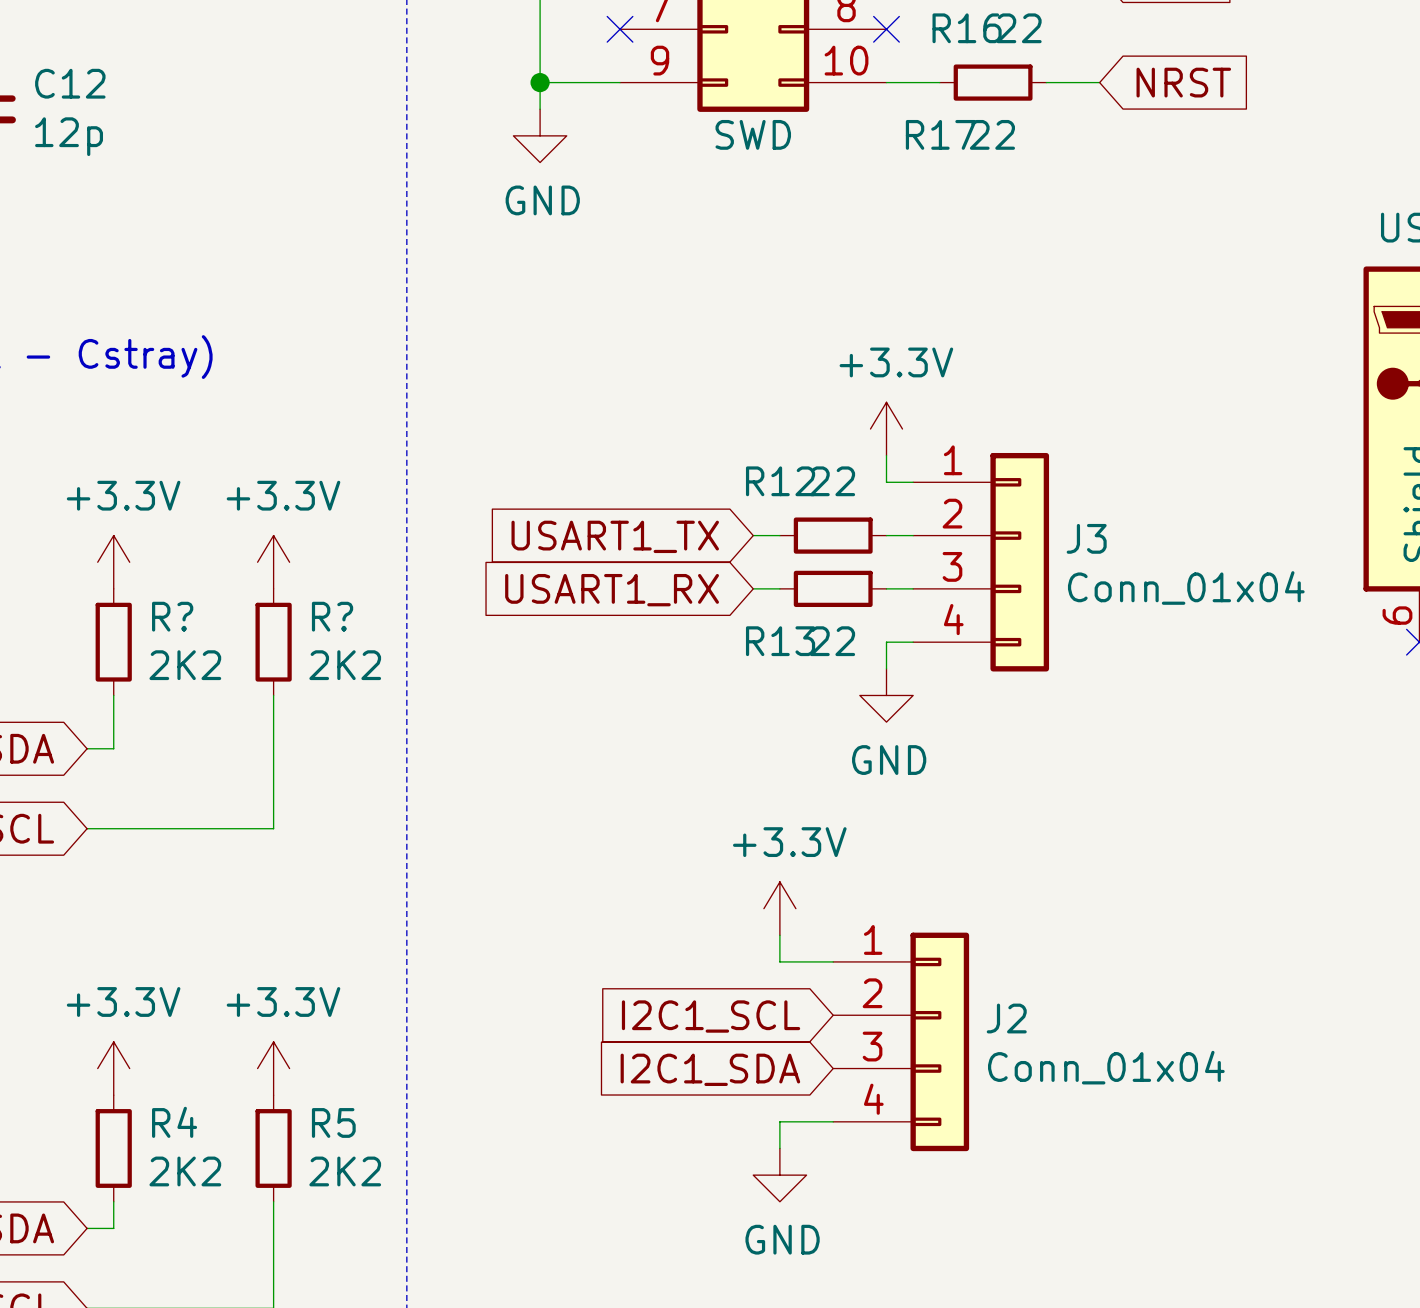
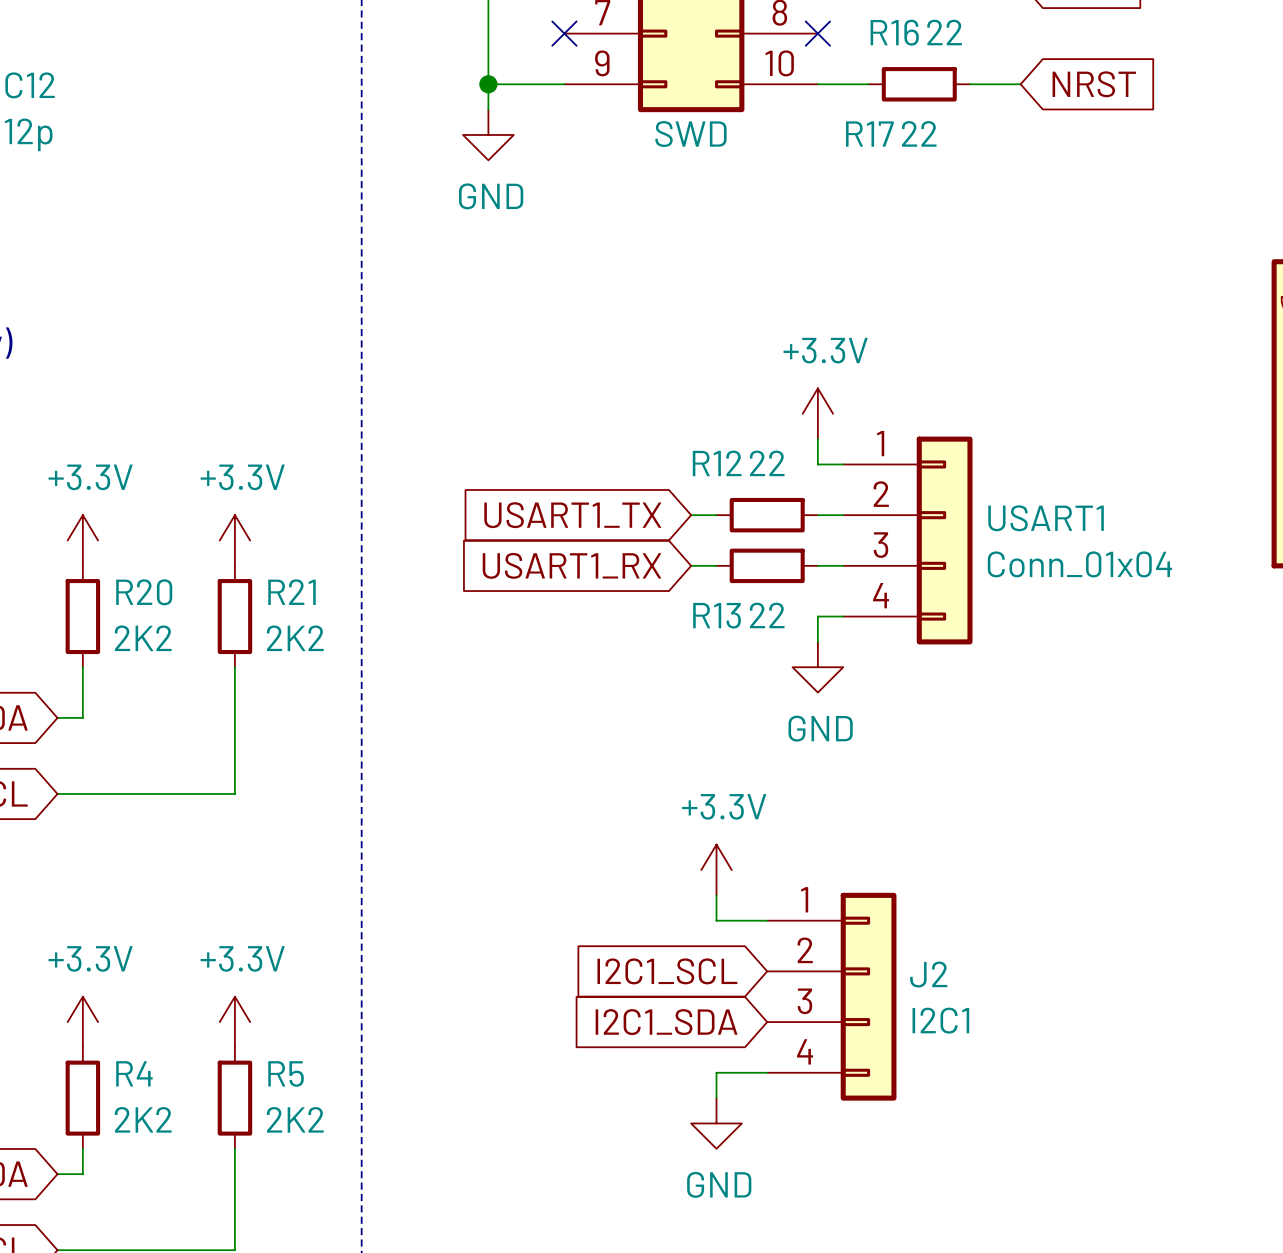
J3 name: J3 (1086, 538) -> USART1 (1046, 518)
R? name: R? (172, 616) -> R20 (144, 592)
R? name: R? (332, 616) -> R21 (291, 592)
J2 value: Conn_01x04 (1106, 1067) -> I2C1 (940, 1020)

